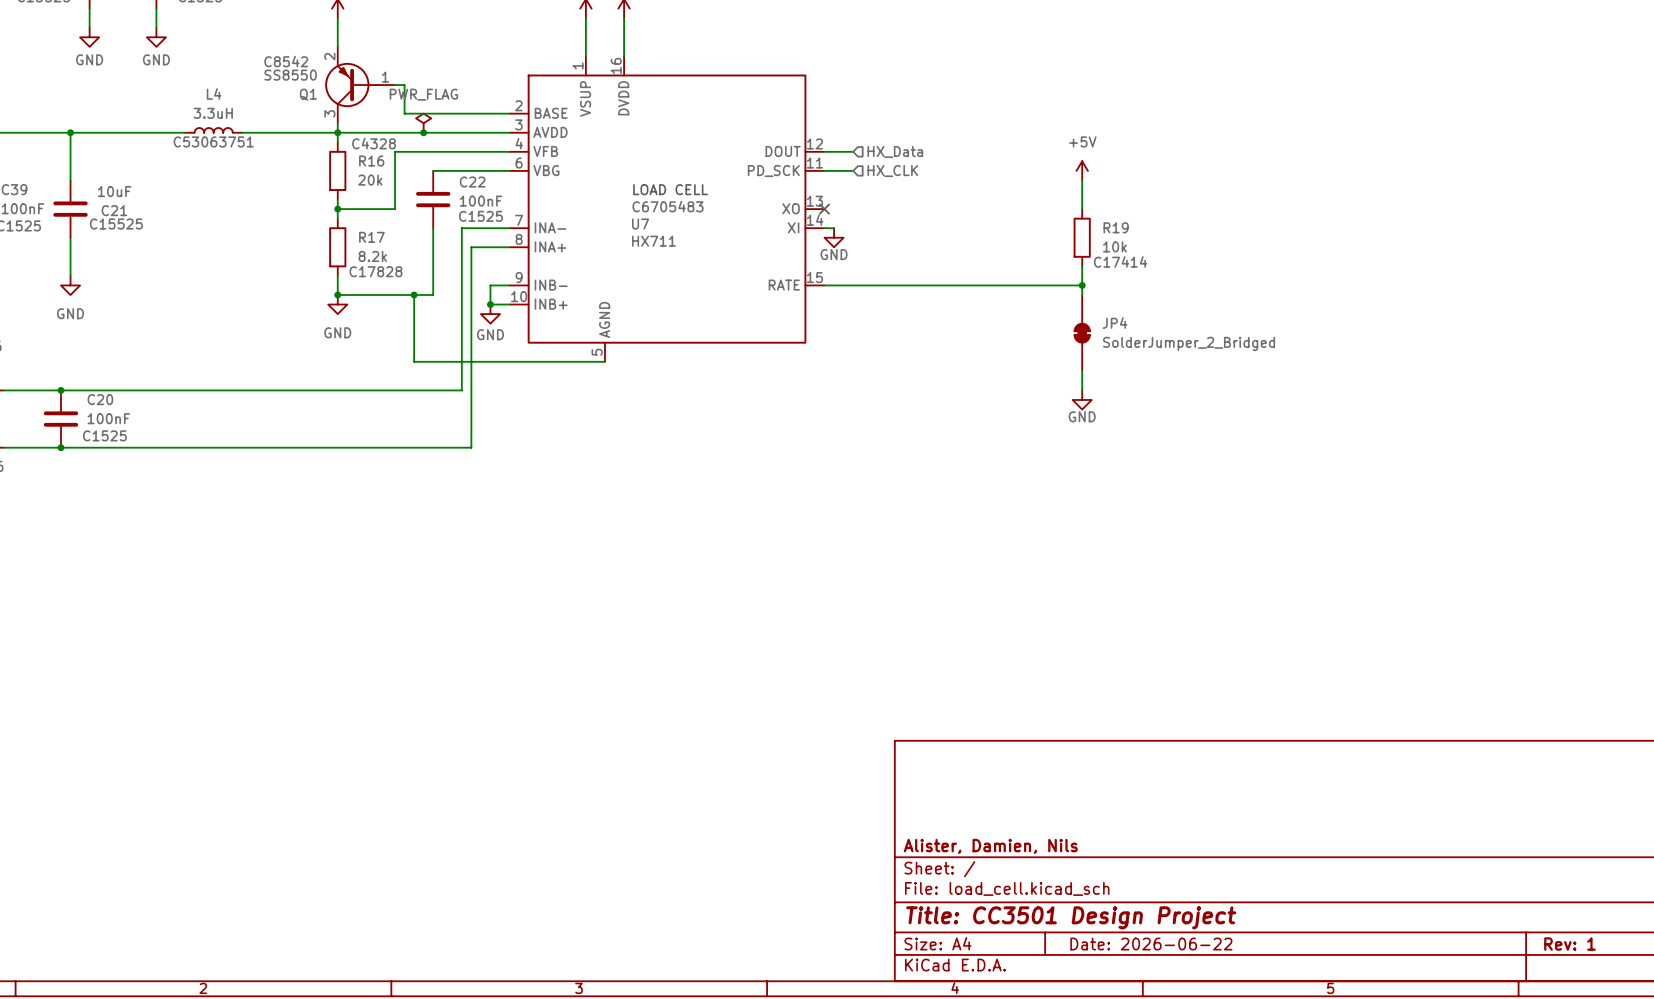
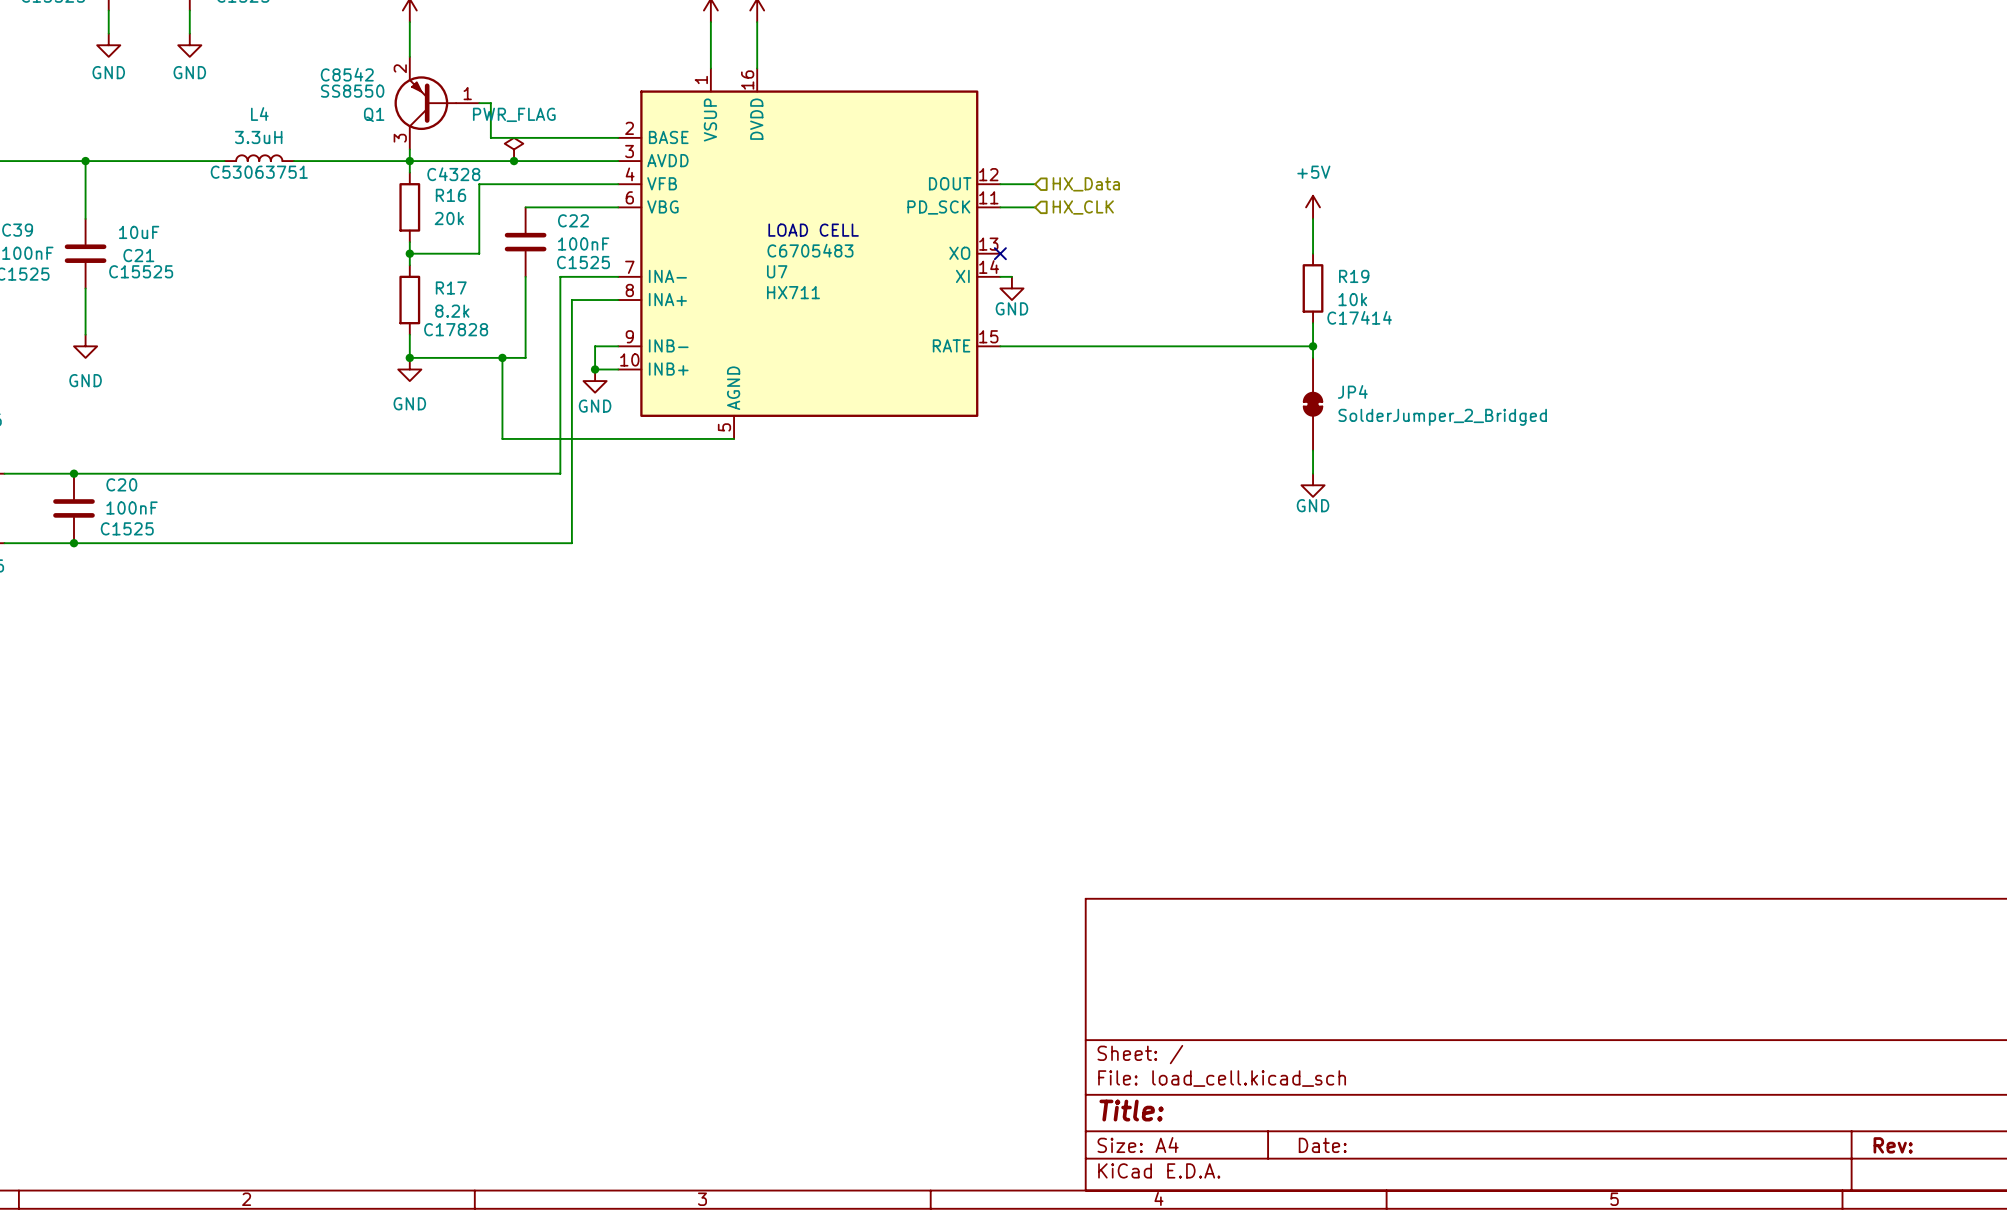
title block: Alister, Damien, Nils (990, 846) -> none
title block: Title: CC3501 Design Project (1071, 917) -> Title: (1131, 1110)
title block: Date: 2026-06-22 (1151, 944) -> Date: (1322, 1145)
title block: Rev: 1 (1569, 944) -> Rev: (1893, 1145)

